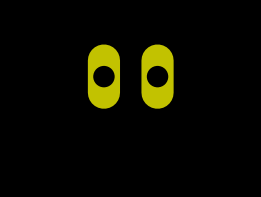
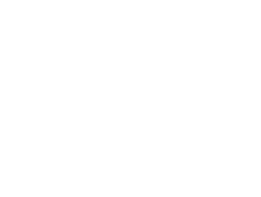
part: (130, 76) -> none

